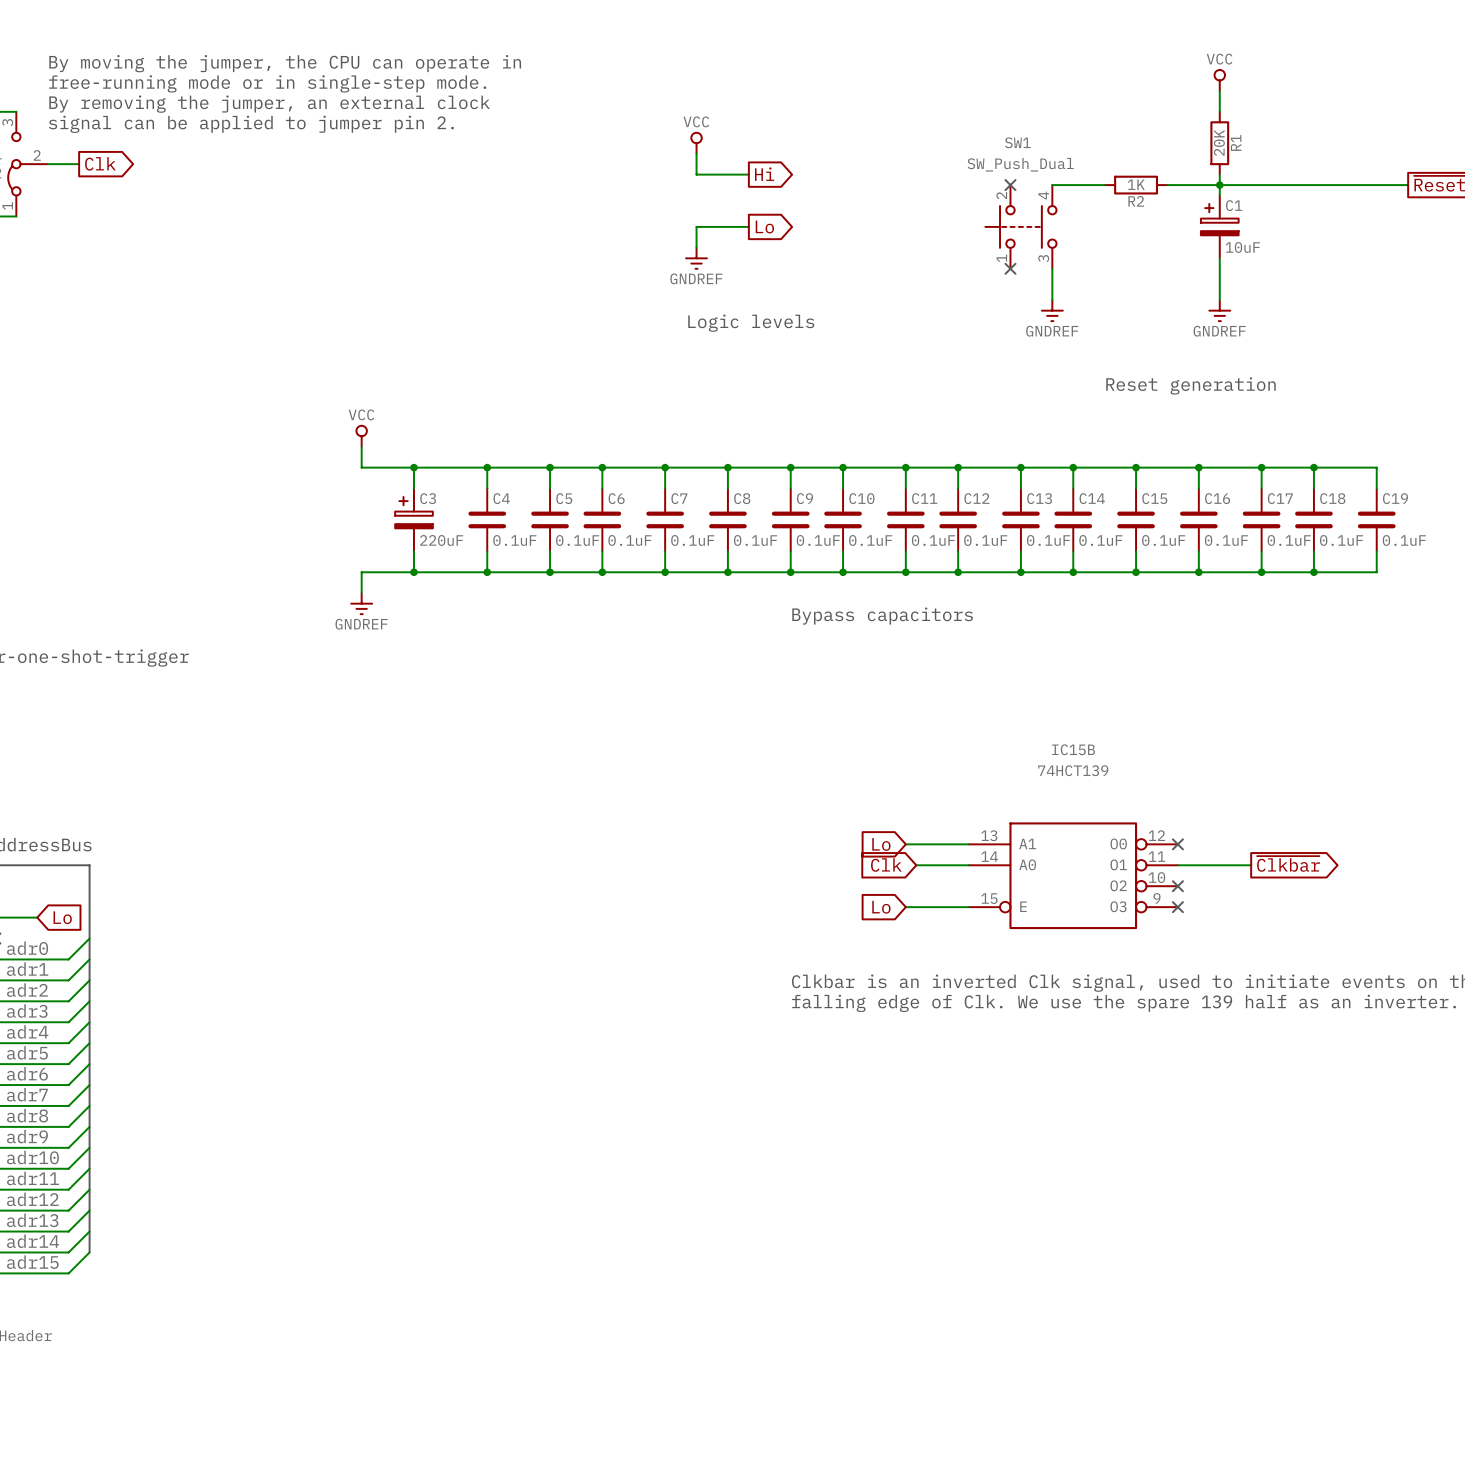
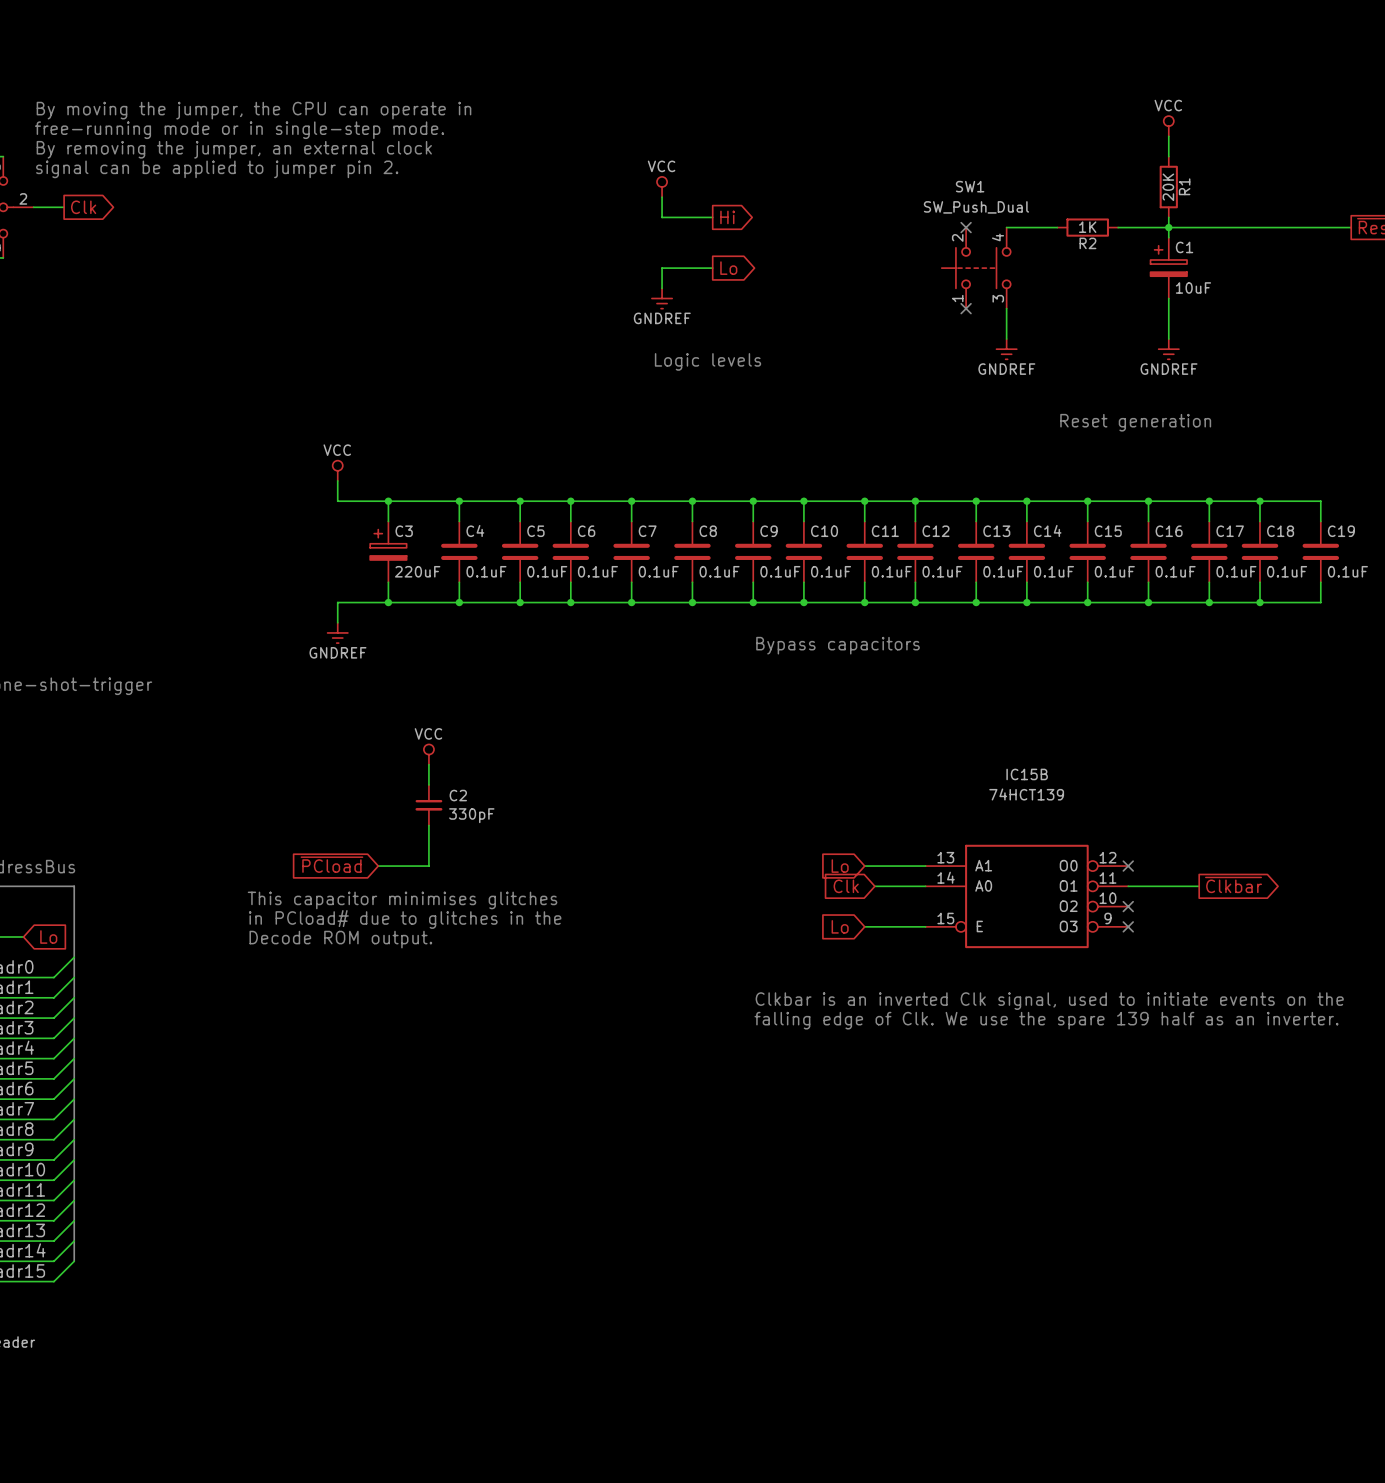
power symbol: none -> VCC (428, 754)
wire: none -> (428, 764) (428, 784)
C2: none -> 330pF (428, 805)
wire: none -> (428, 825) (428, 866) (378, 866)
global label: none -> ~{PCload} (331, 864)
text: none -> This capacitor minimises glitches (402, 900)
text: none -> in PCload# due to glitches in the (405, 919)
text: none -> Decode ROM output. (340, 939)

